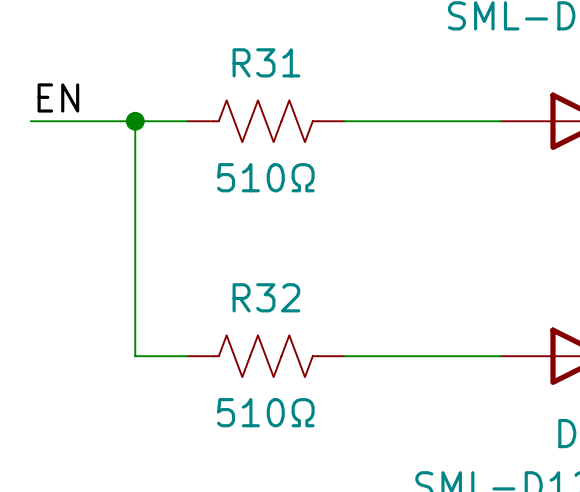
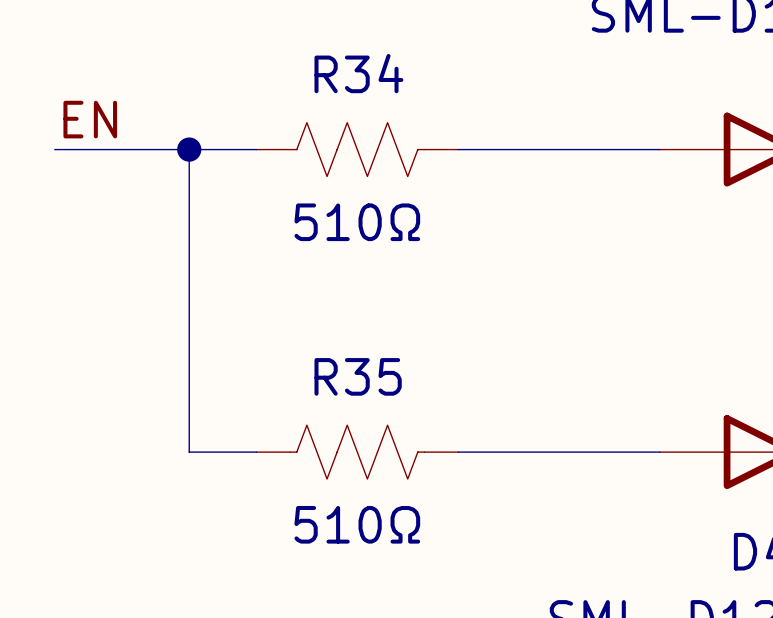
R31 name: R31 (266, 62) -> R34 (358, 73)
R32 name: R32 (266, 297) -> R35 (358, 376)

